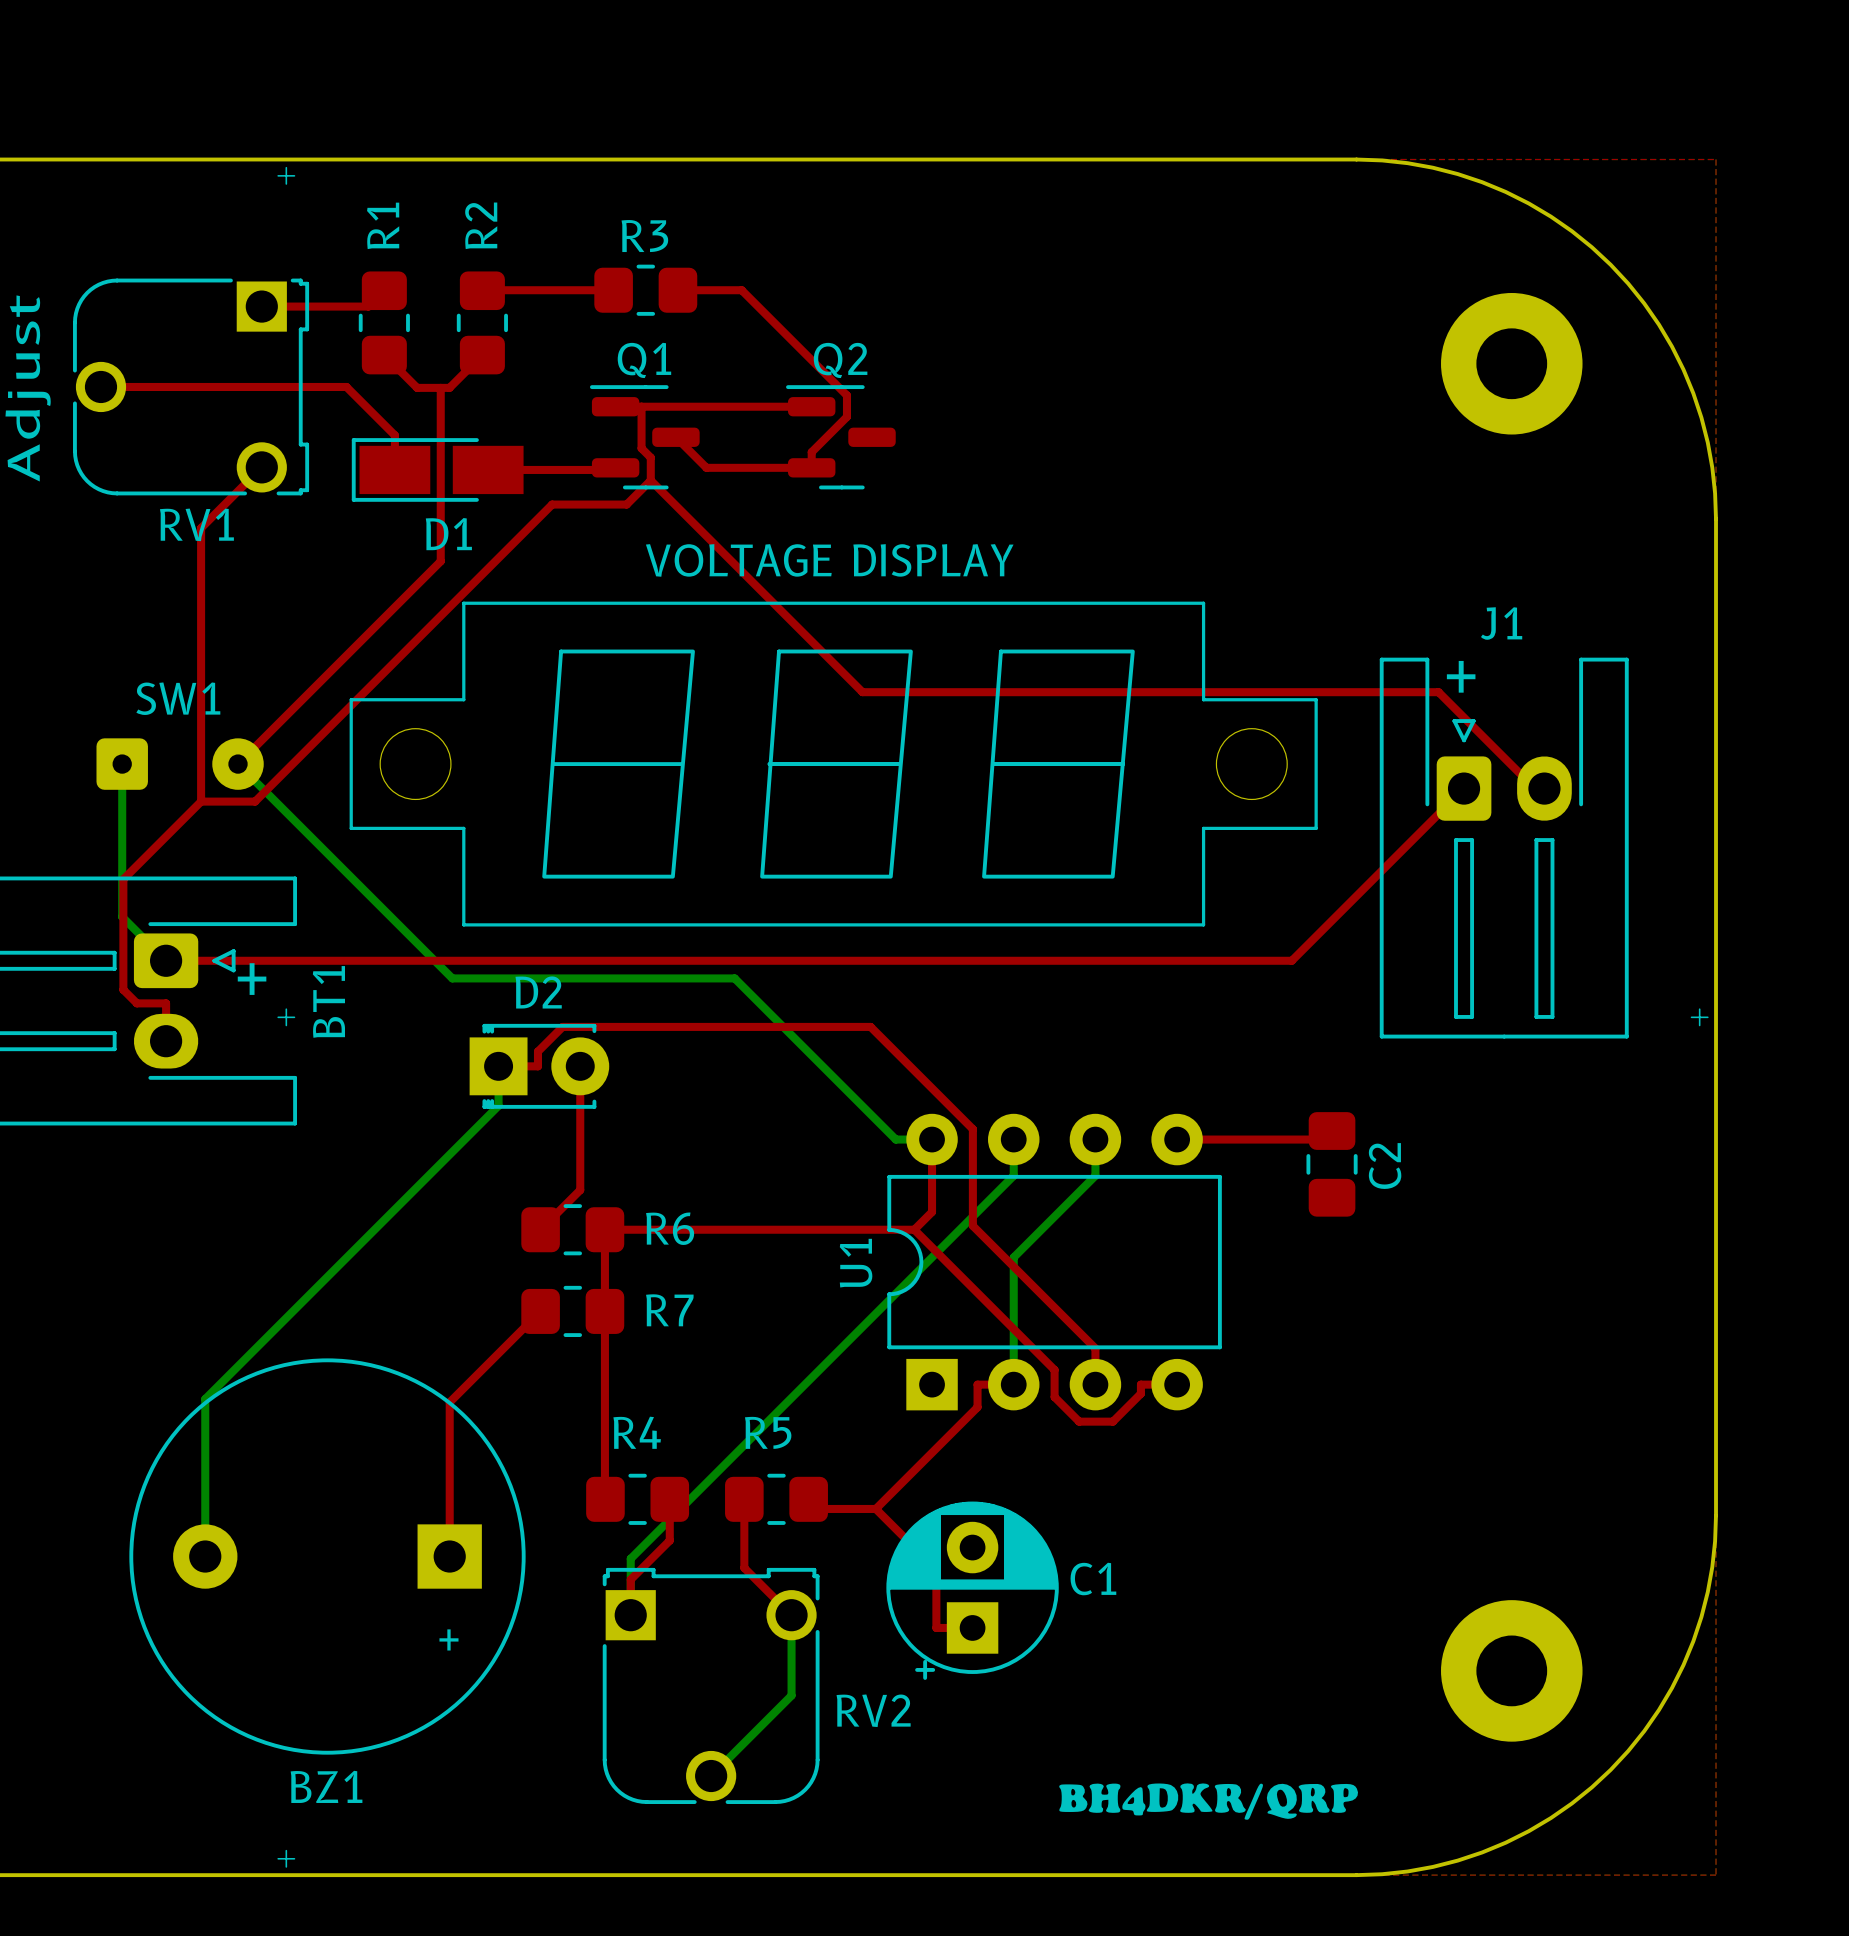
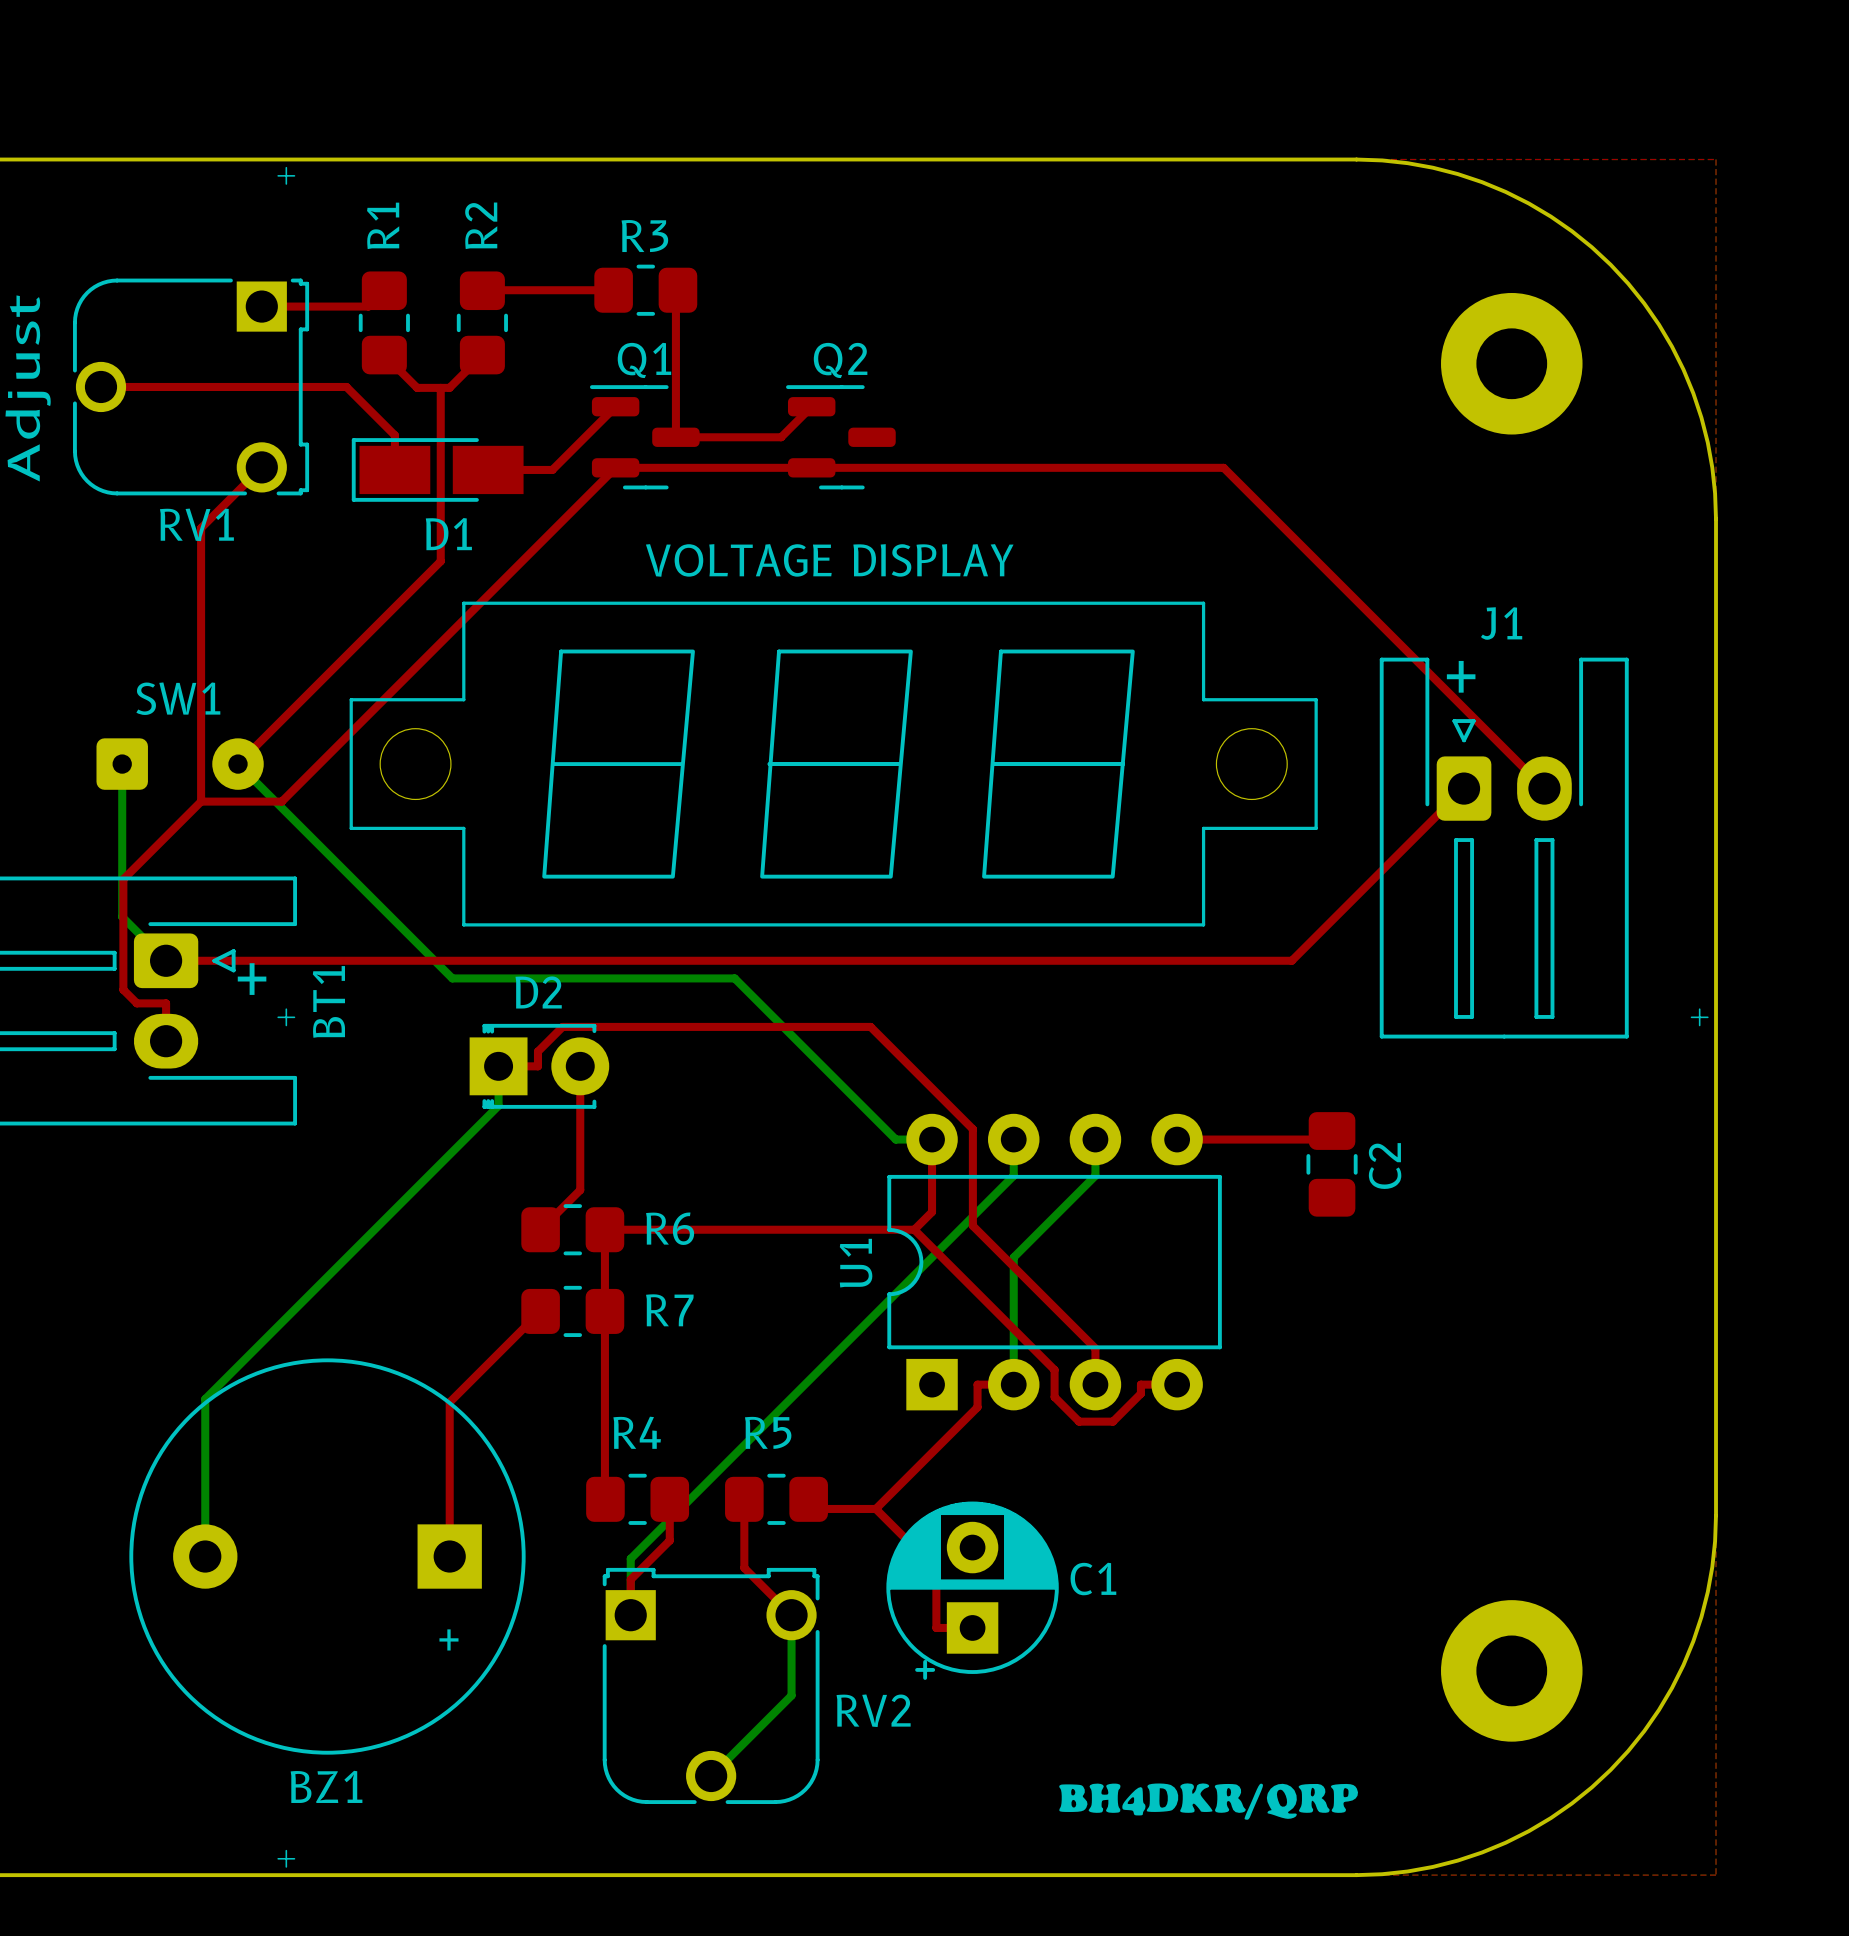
top track: (677, 290) (741, 290) (846, 395) (846, 416) (811, 452) (811, 467) -> (677, 290) (675, 292) (675, 437) (781, 437) (811, 406)
top track: (615, 406) (811, 406) -> none
top track: (641, 406) (641, 448) (650, 457) (650, 480) -> none
top track: (675, 437) (706, 467) -> (615, 467) (706, 467)
top track: (552, 469) (613, 469) -> (552, 469) (615, 406)
top track: (650, 480) (626, 504) (552, 504) (255, 801) -> (613, 469) (281, 801) (255, 801)
top track: (650, 480) (862, 692) (1438, 692) (1534, 788) (1544, 788) -> (811, 467) (1223, 467) (1544, 788)

